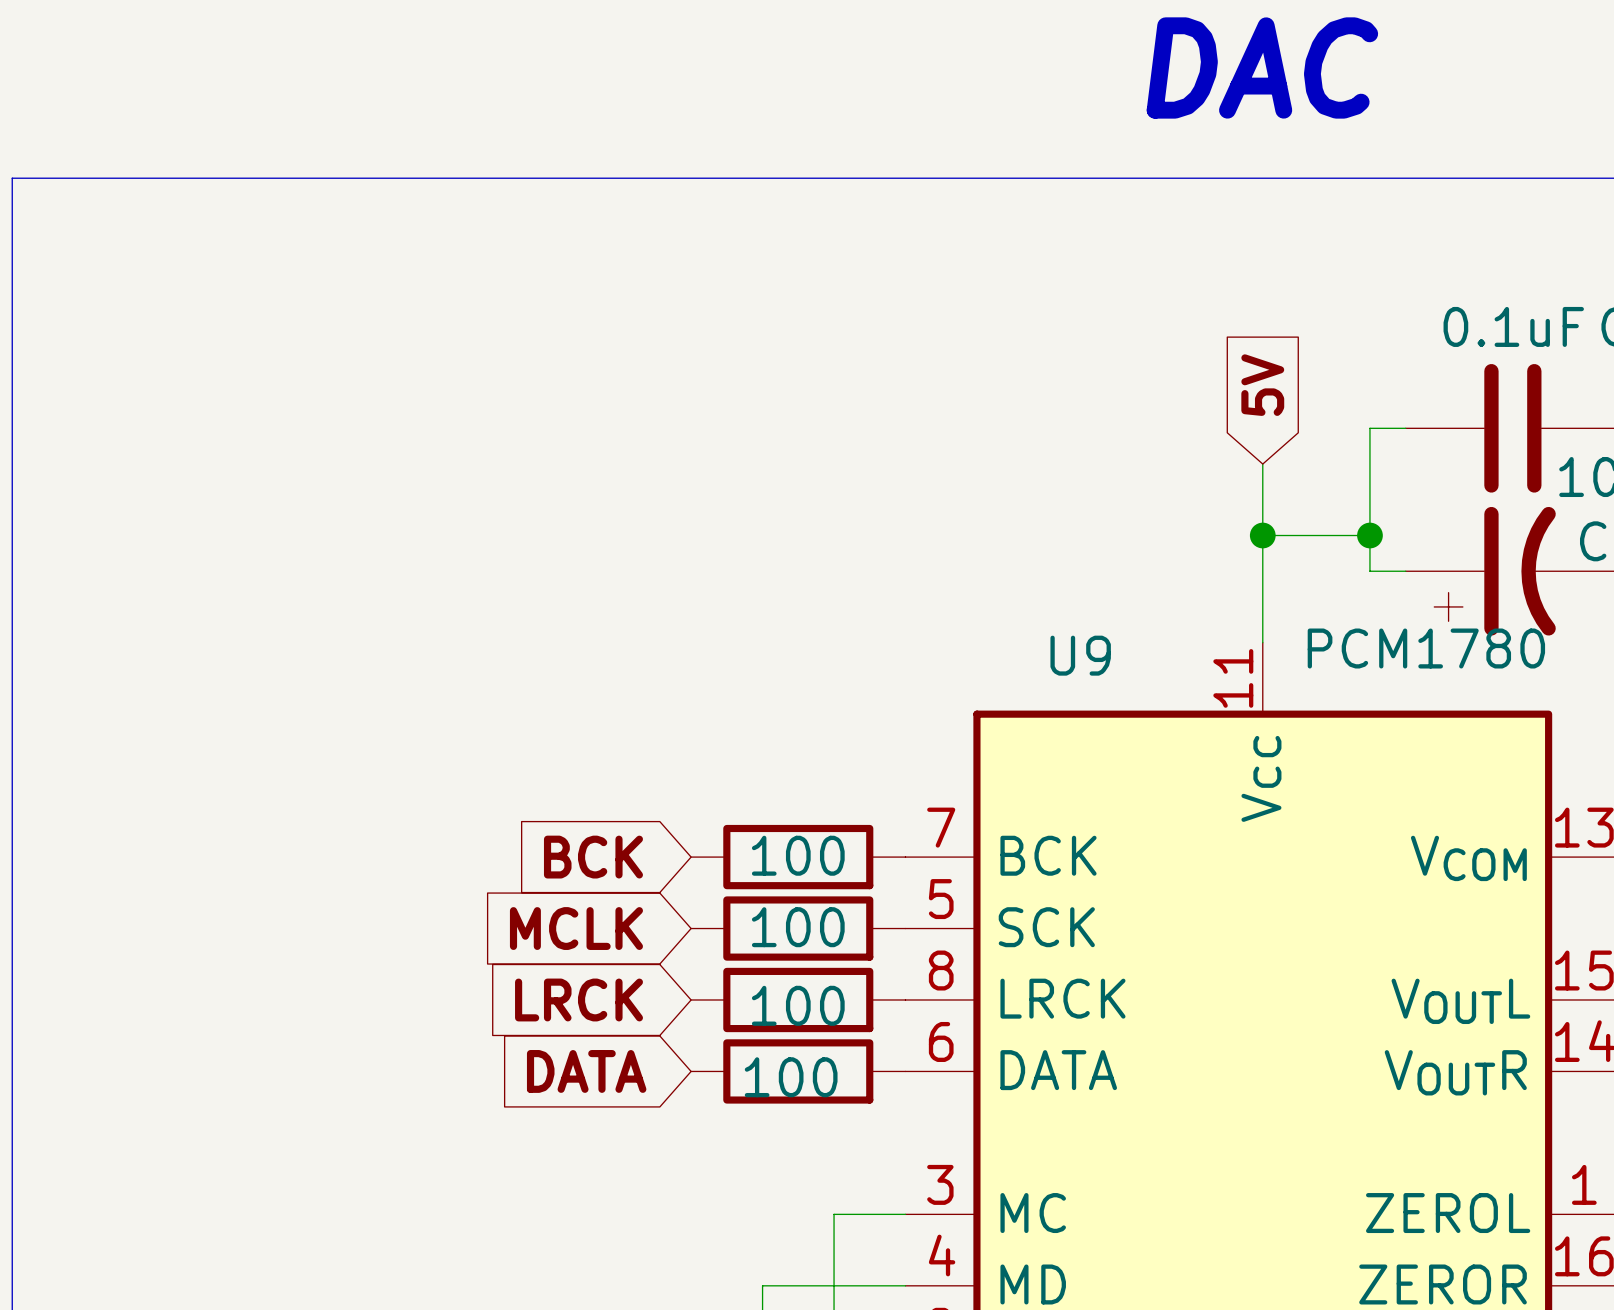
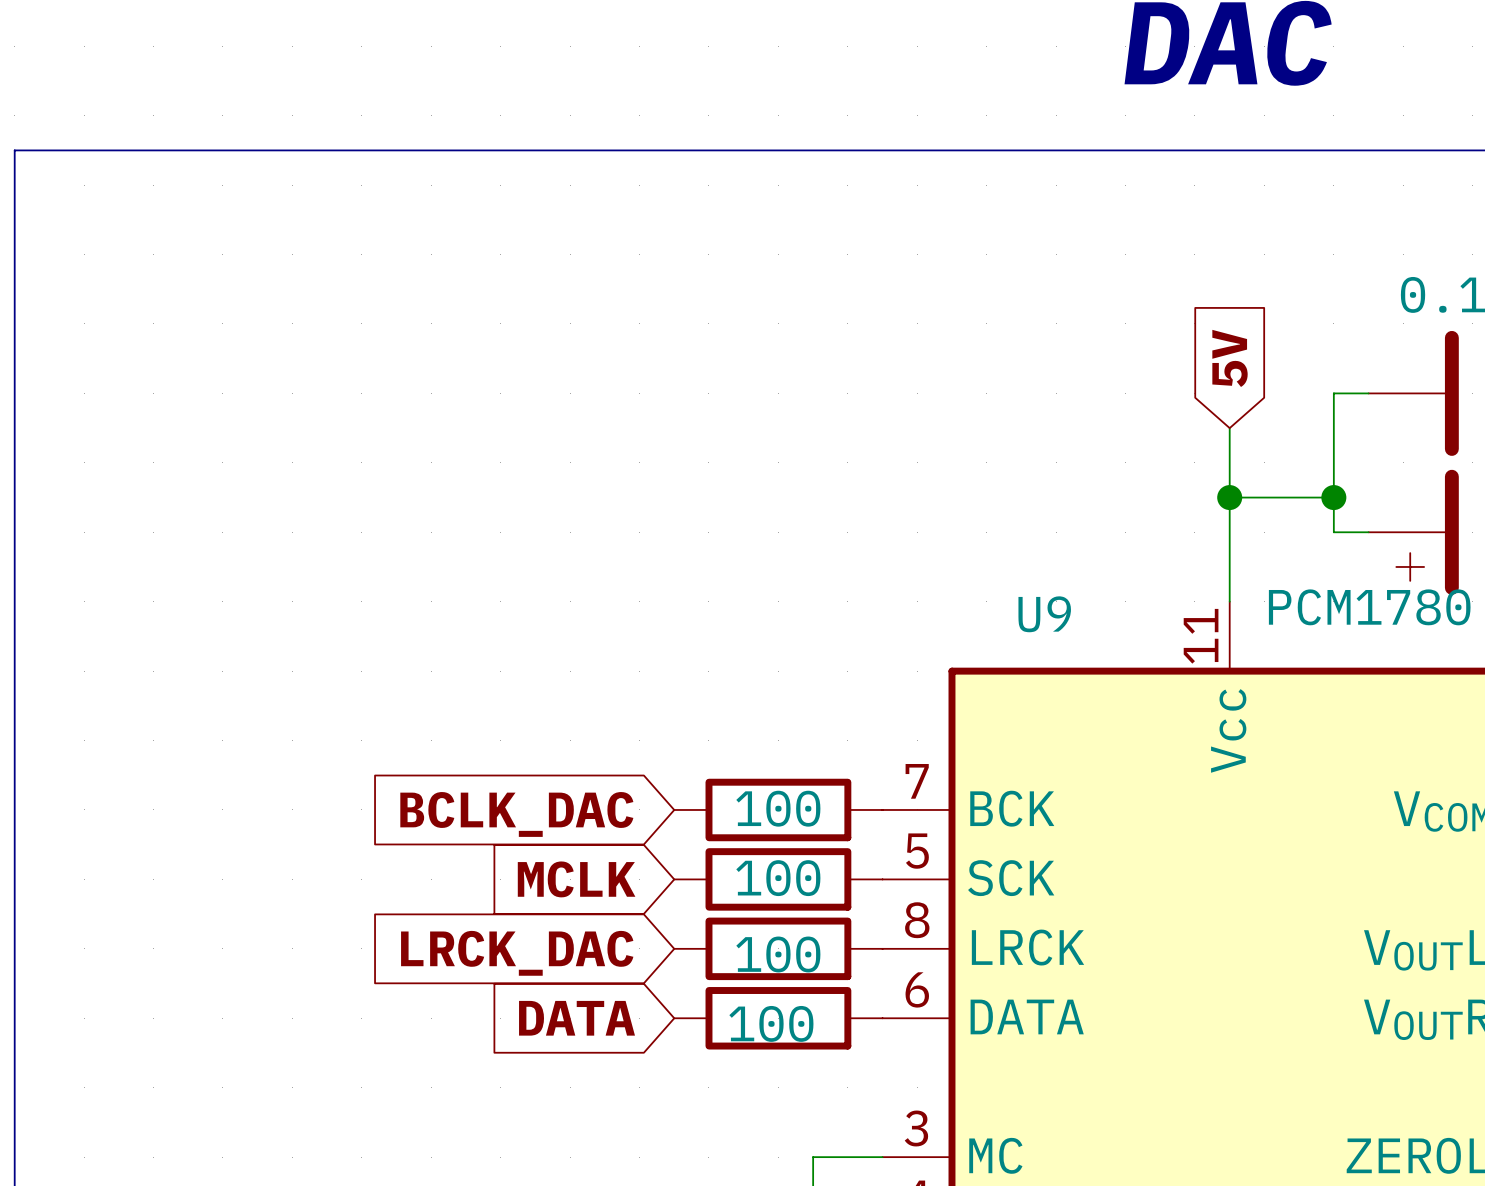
global label: BCK (593, 857) -> BCLK_DAC (516, 814)
global label: LRCK (579, 999) -> LRCK_DAC (517, 953)

